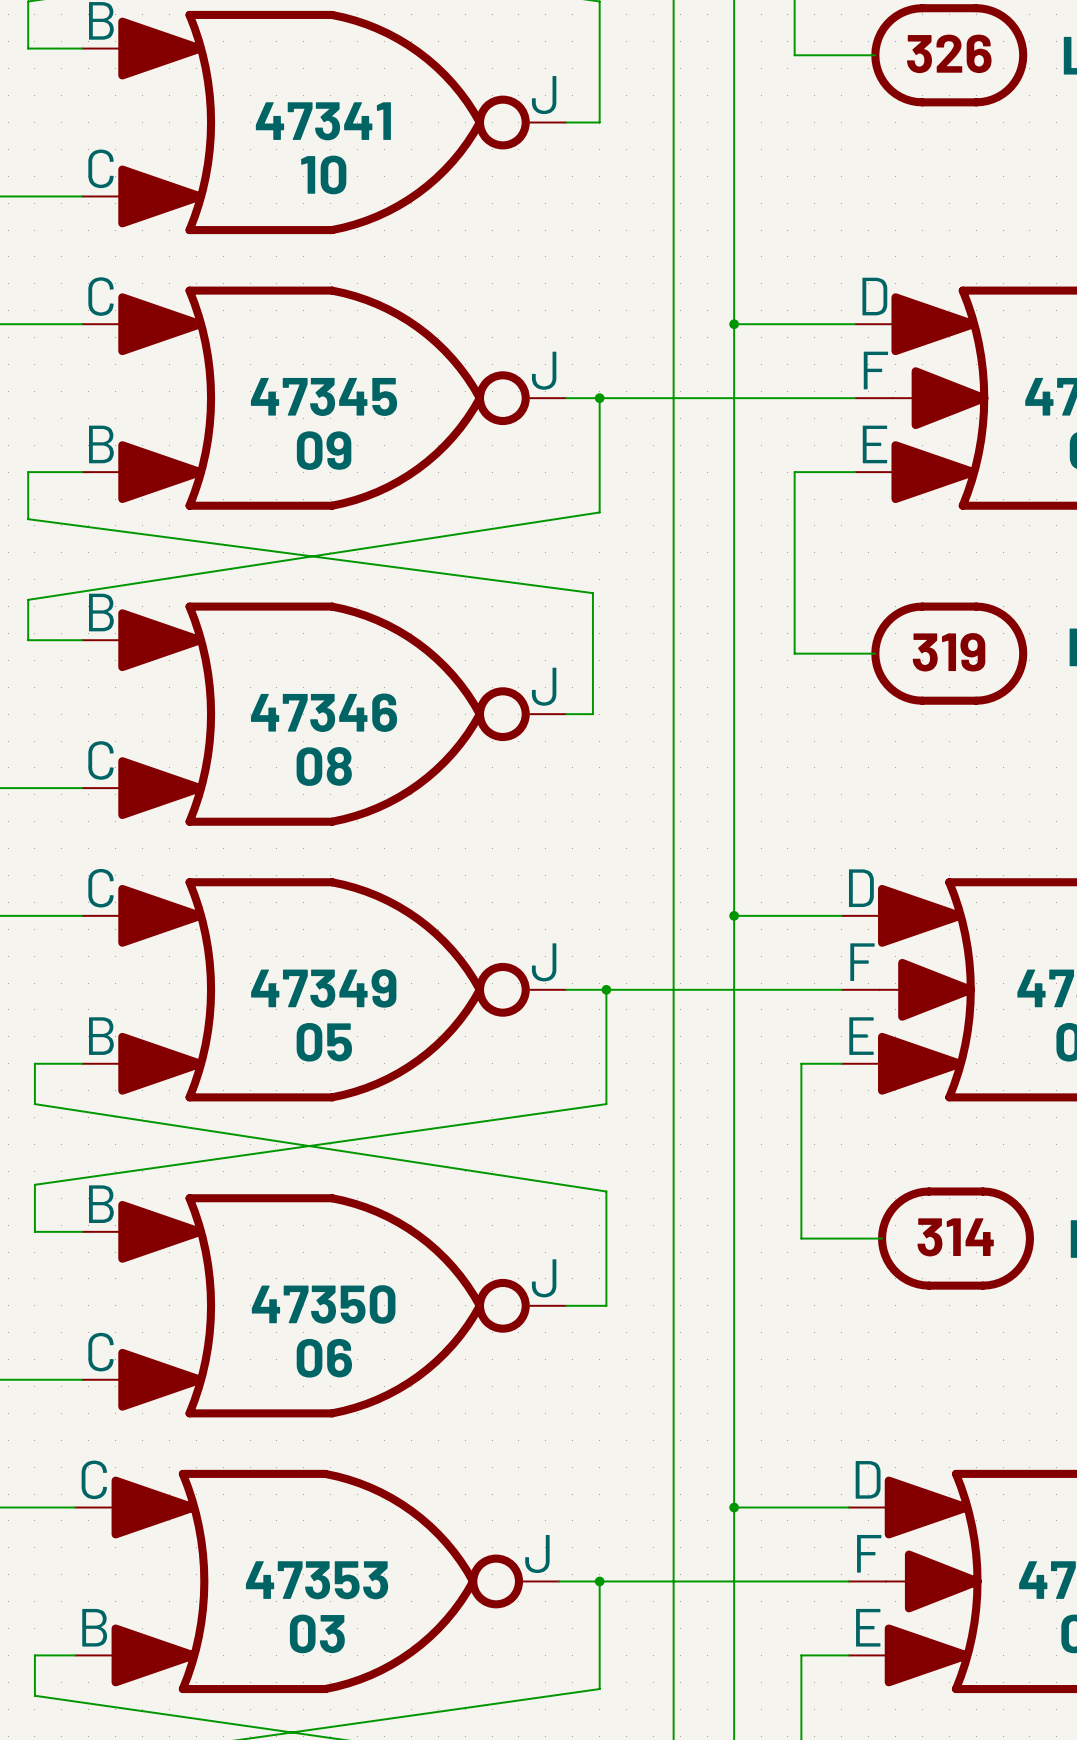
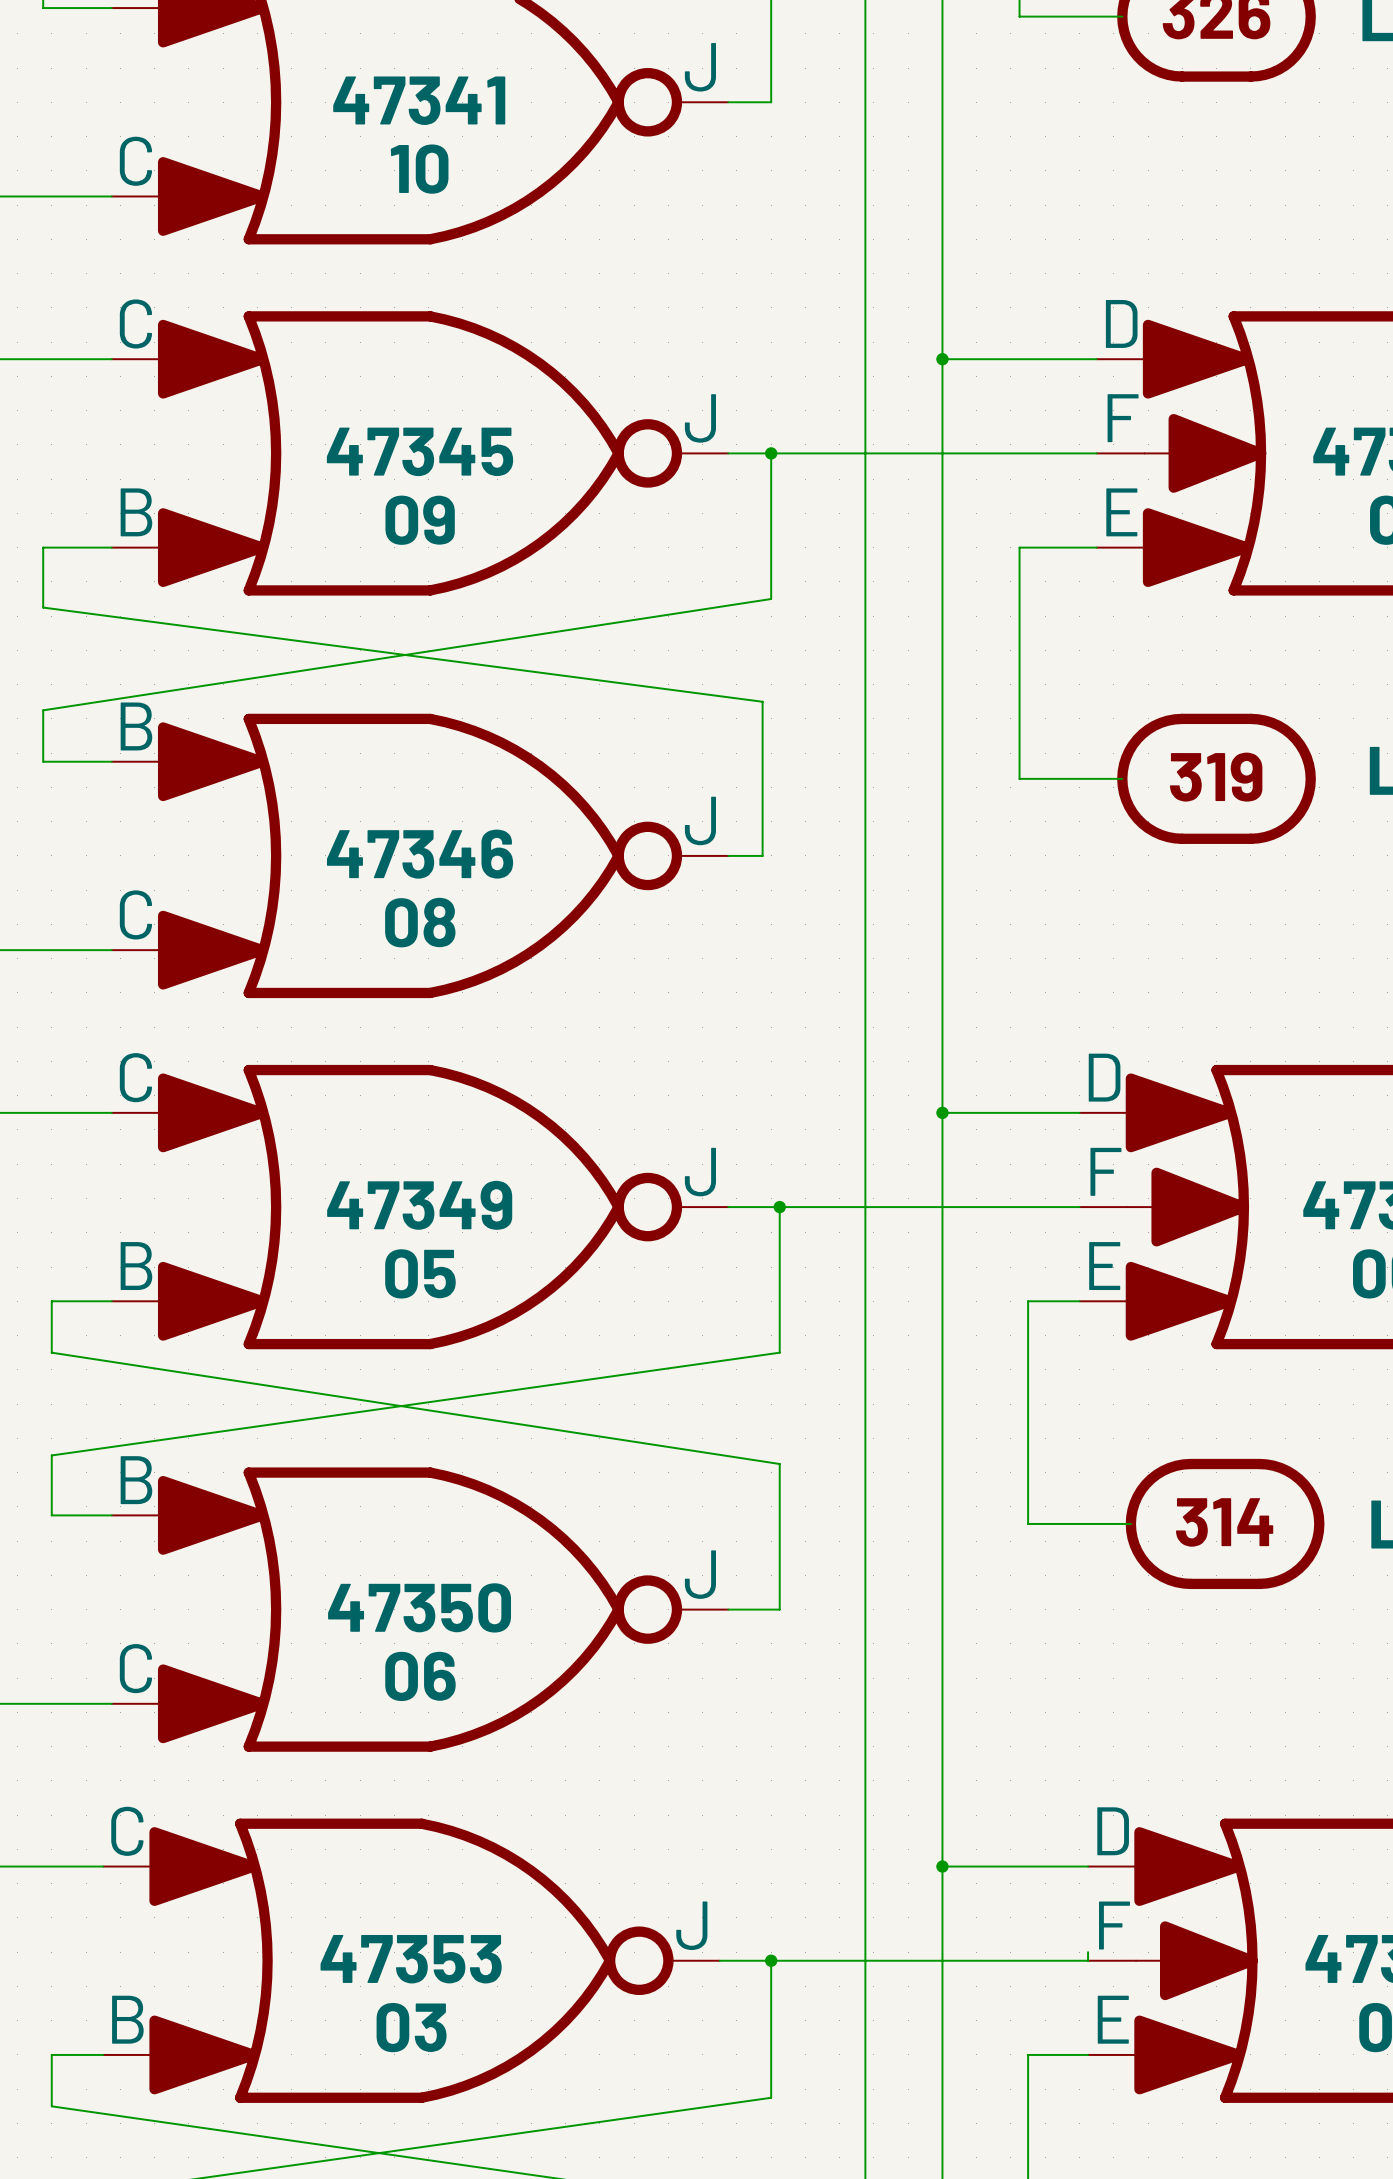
wire: none -> (1088, 1952) (1088, 1960)

